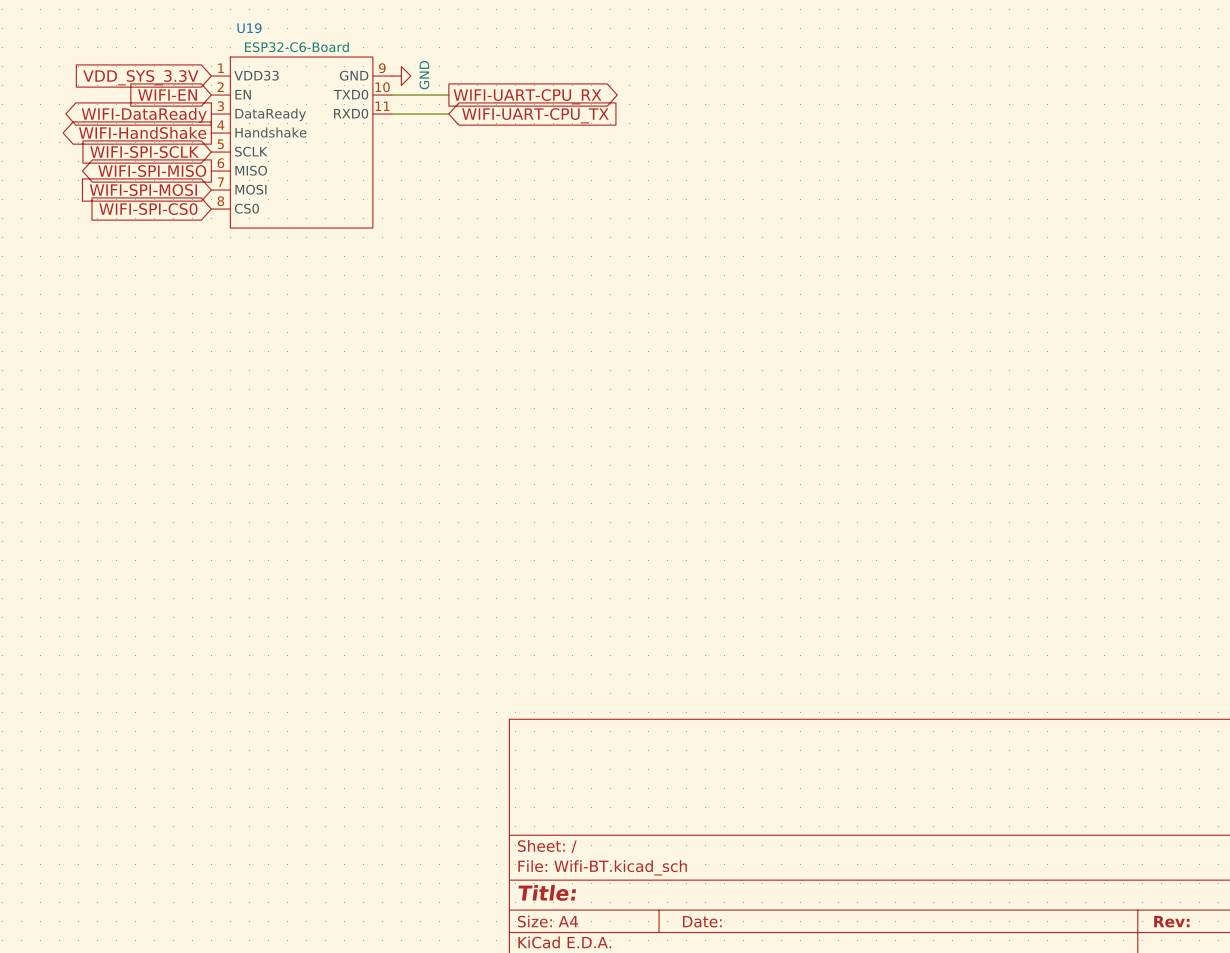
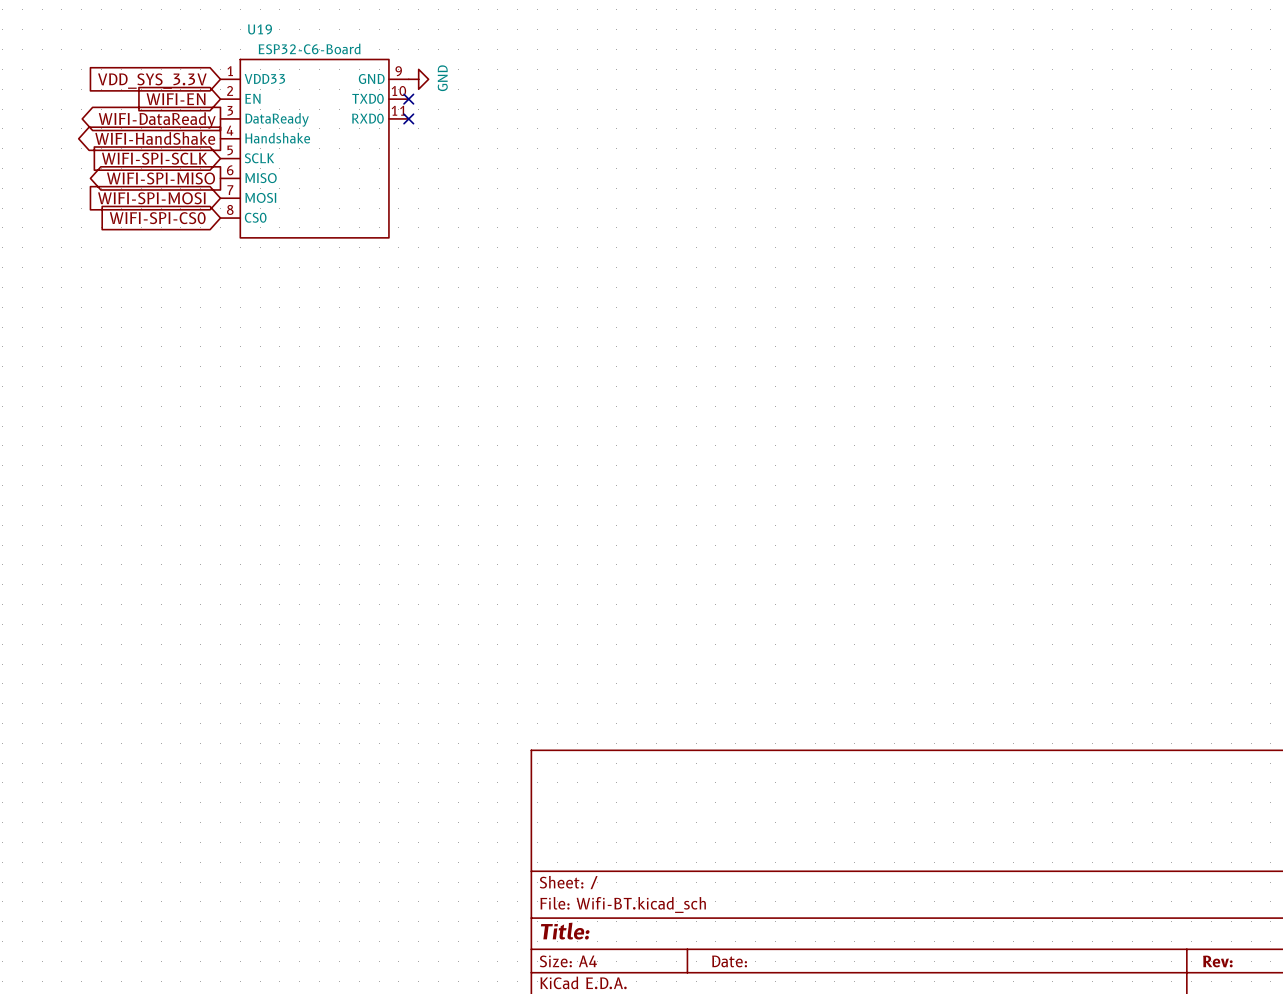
wire: (391, 95) (448, 95) -> none
no-connect mark: none -> (408, 99)
global label: WIFI-UART-CPU_RX (527, 96) -> none
wire: (391, 114) (448, 114) -> none
no-connect mark: none -> (408, 118)
global label: WIFI-UART-CPU_TX (535, 115) -> none

